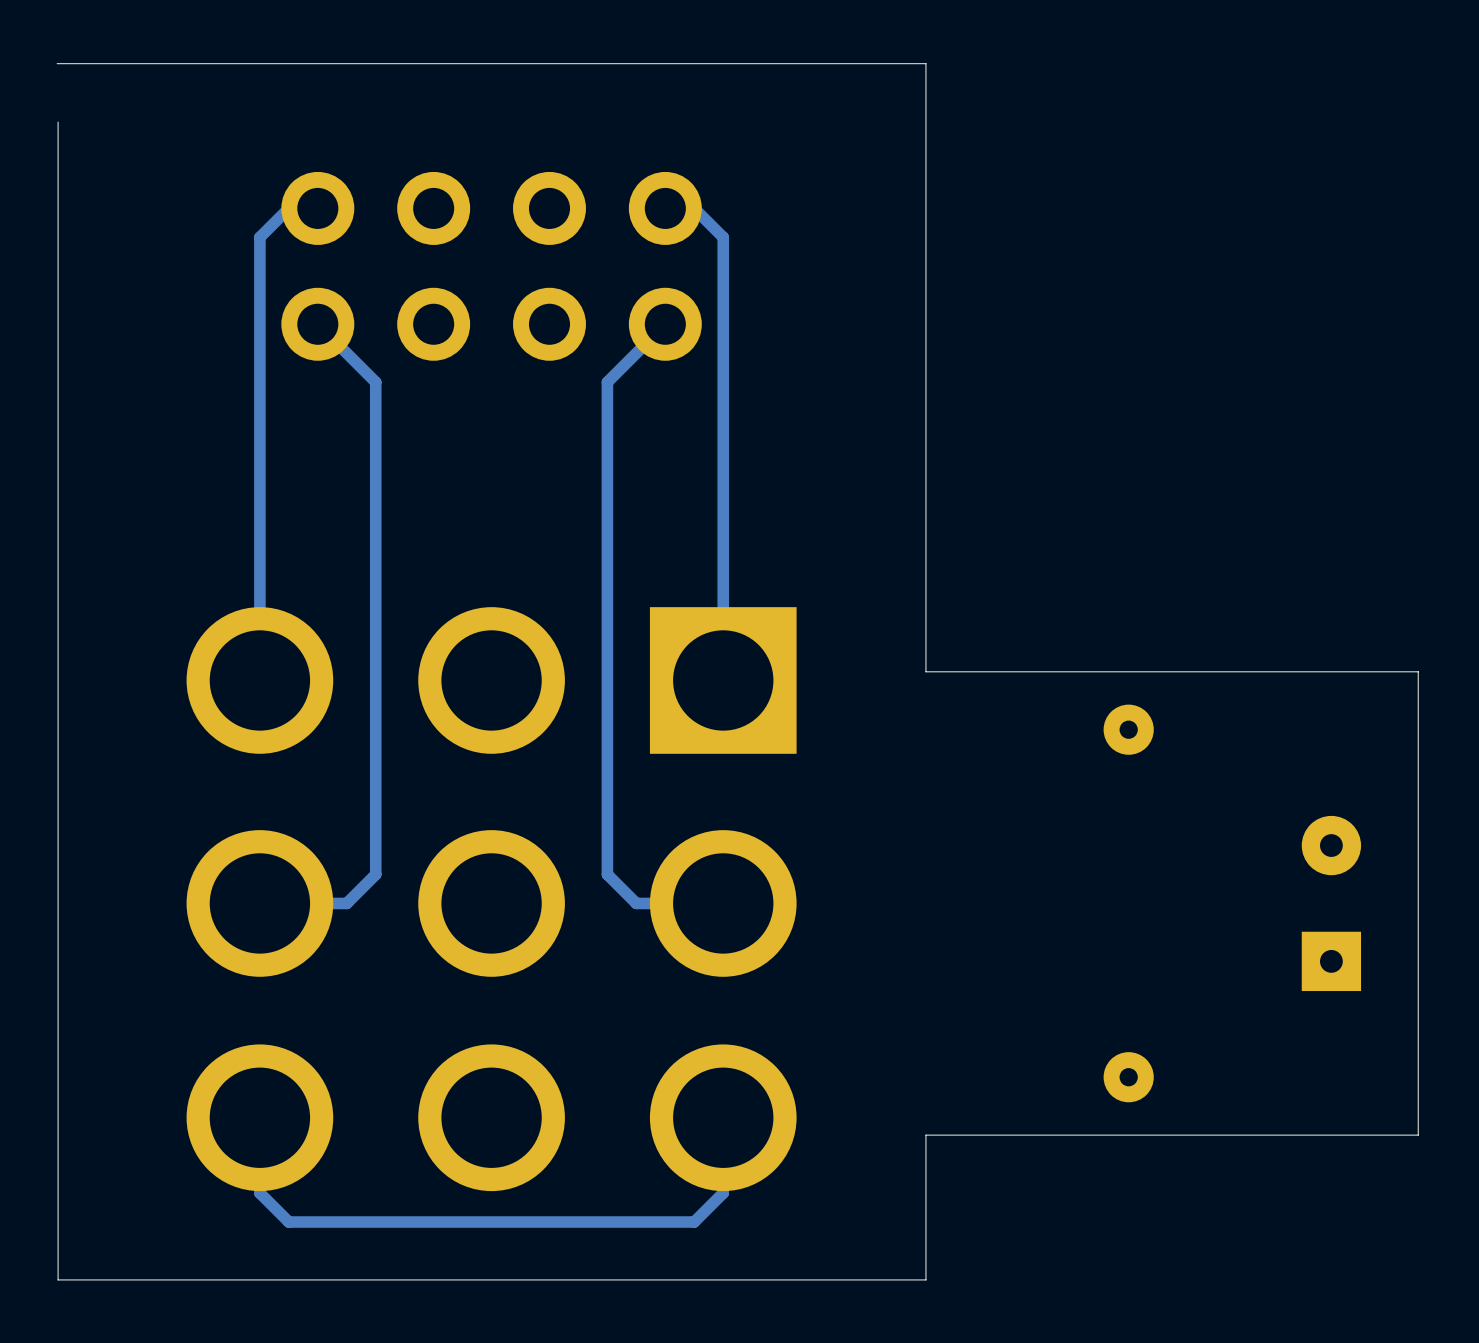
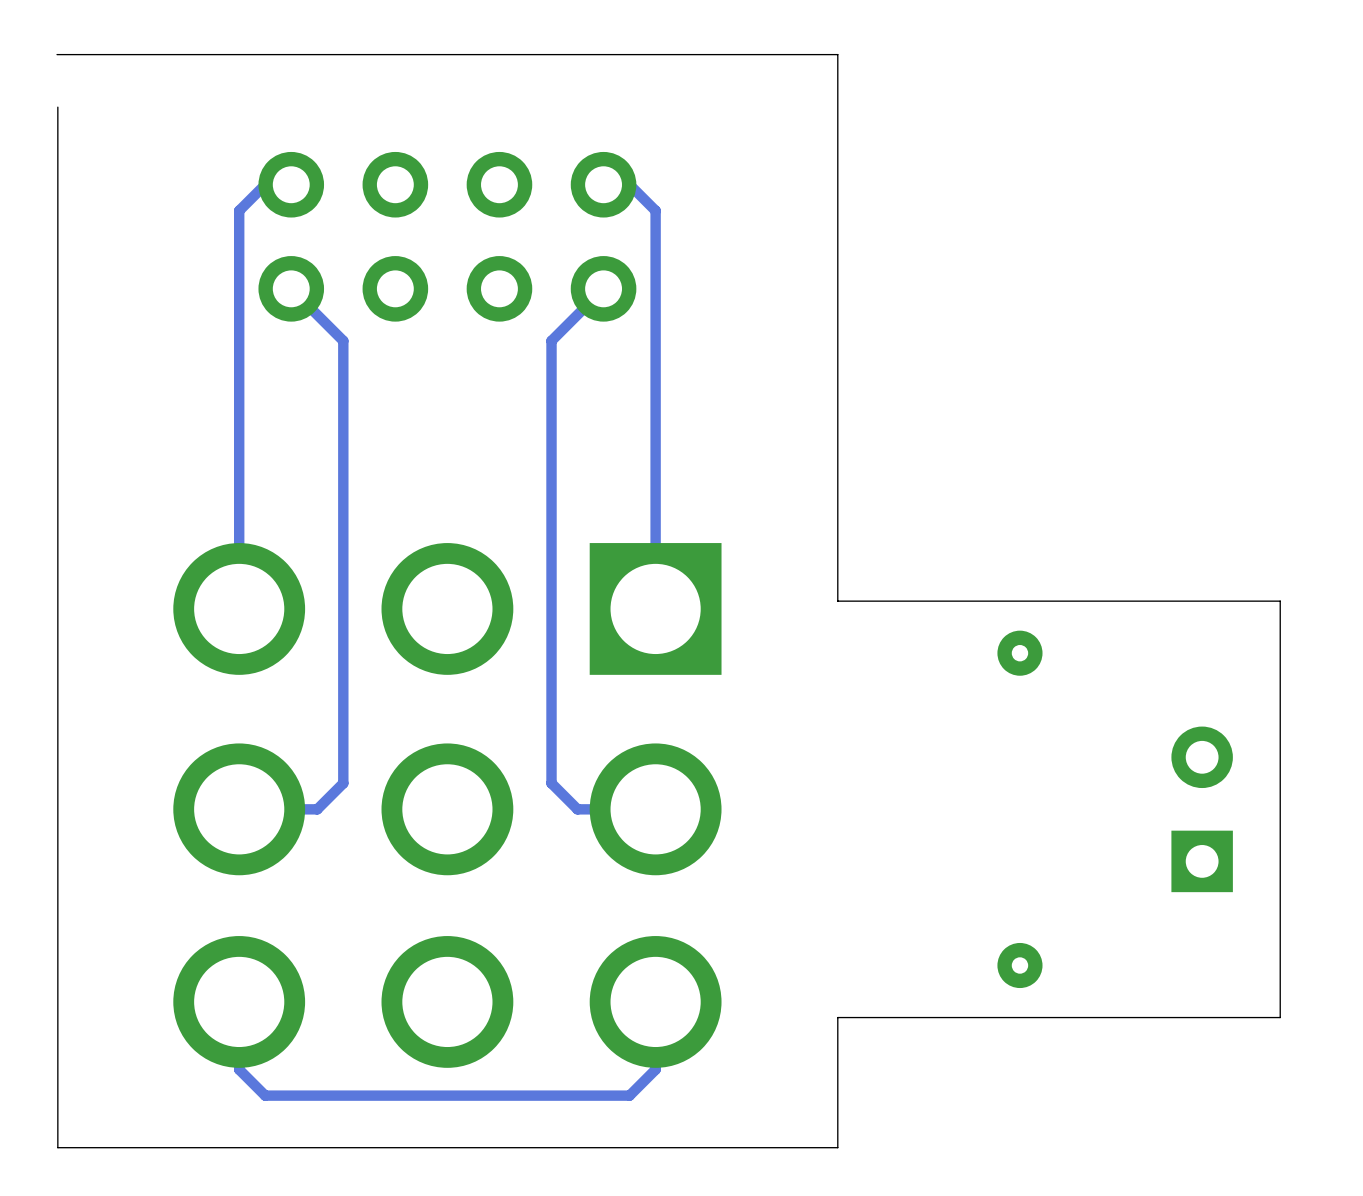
part footprint: [1301, 815, 1362, 992] -> [1171, 726, 1233, 893]

